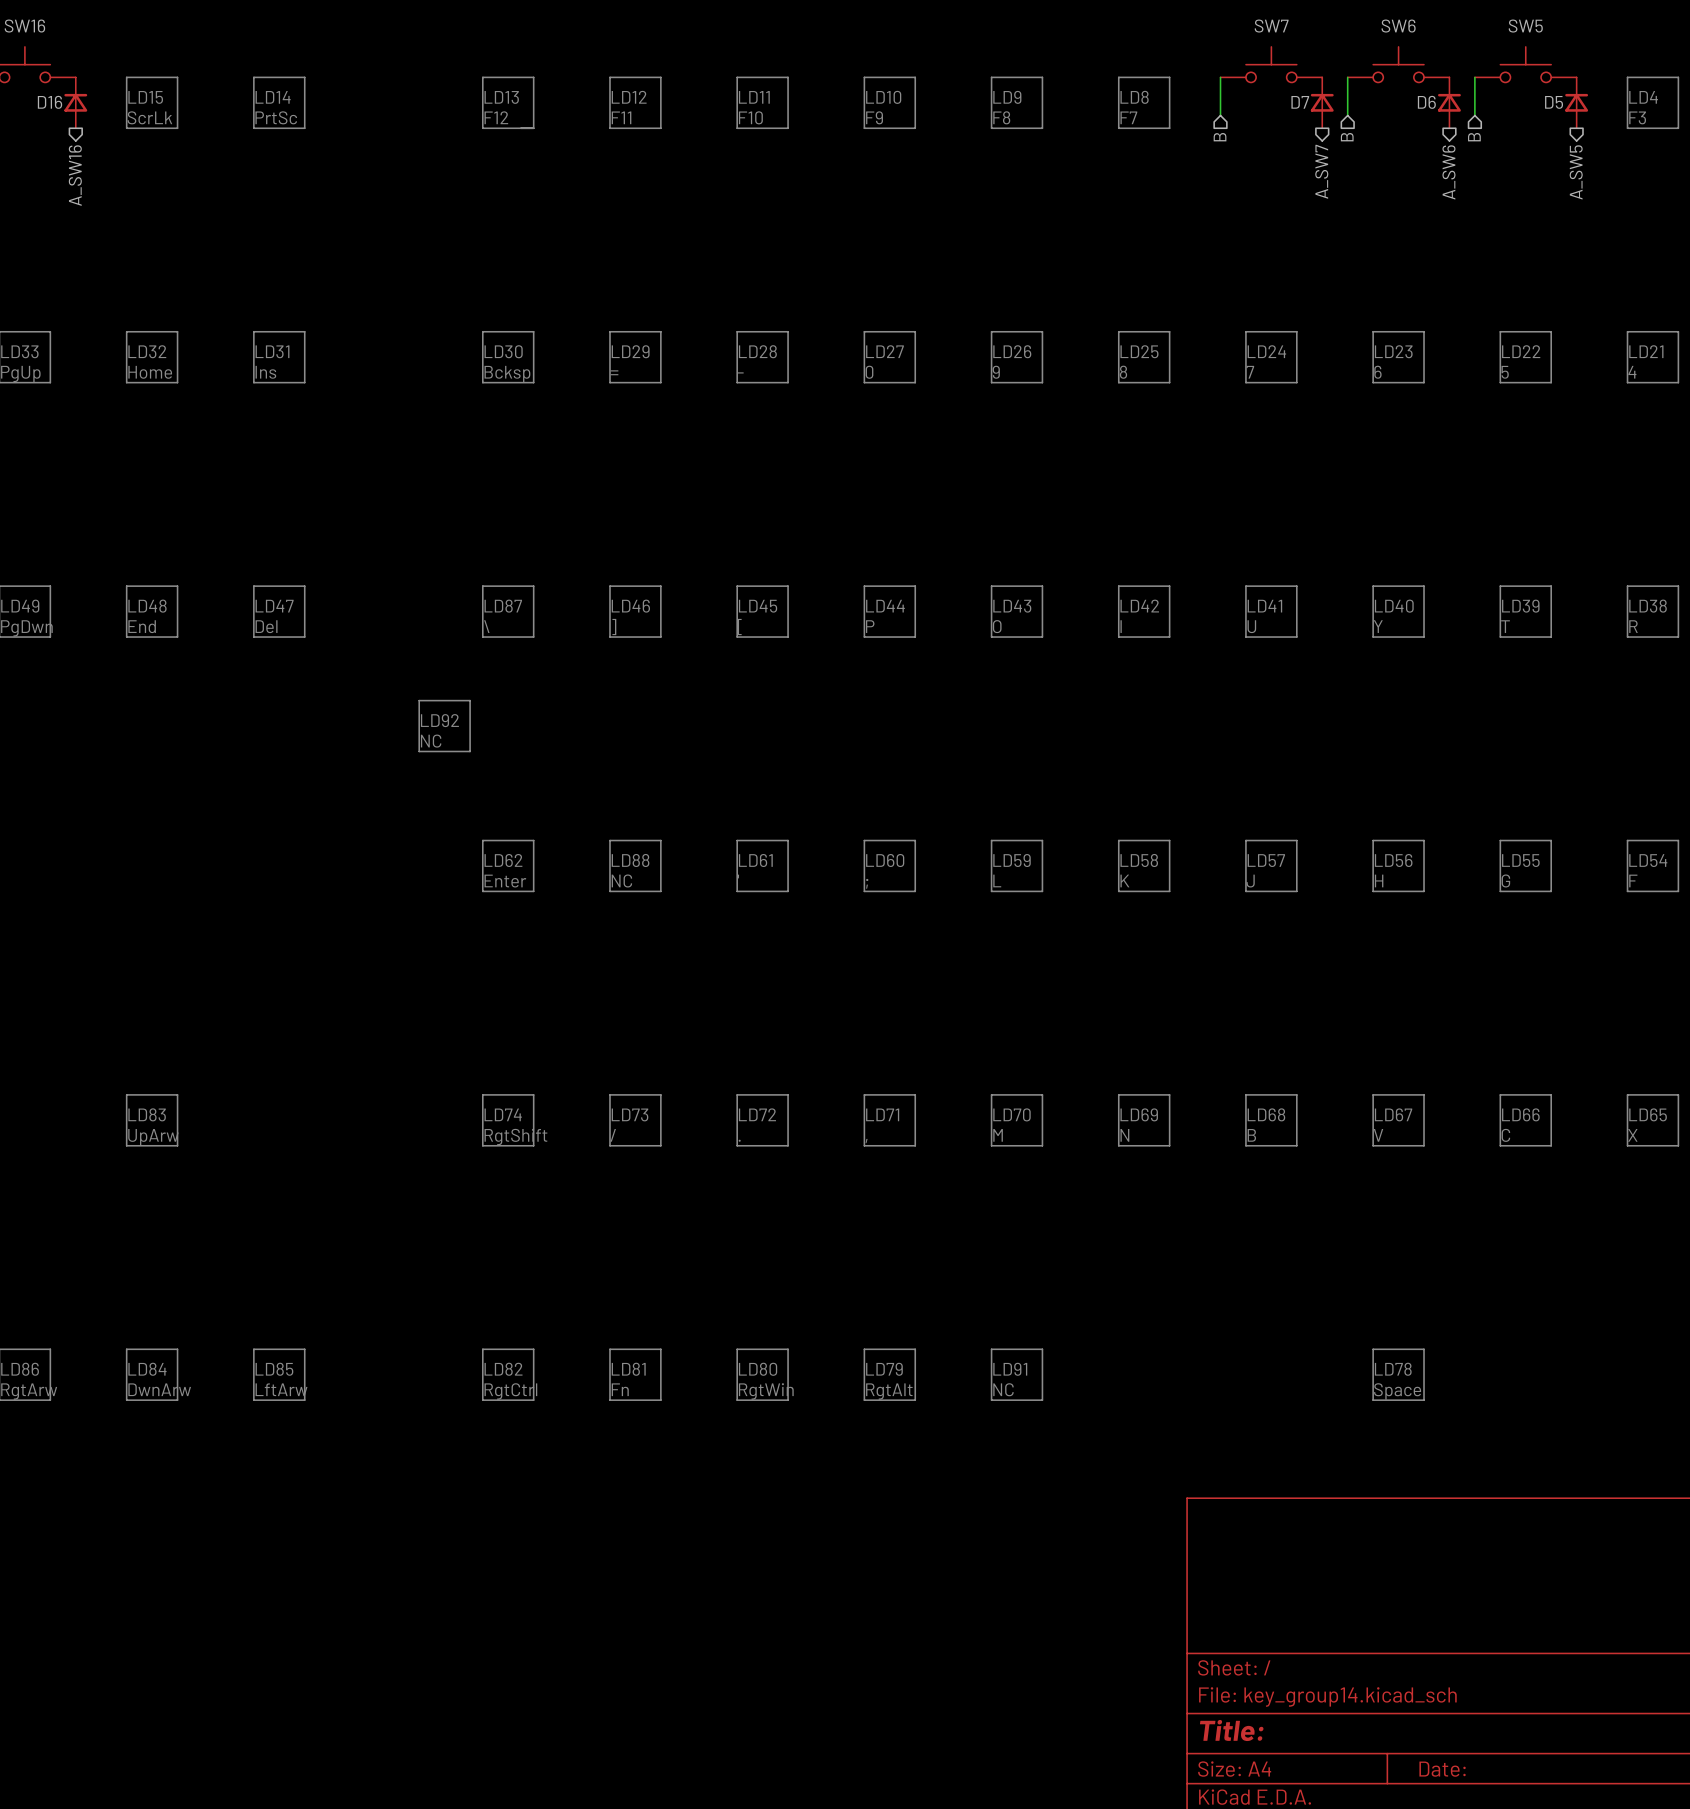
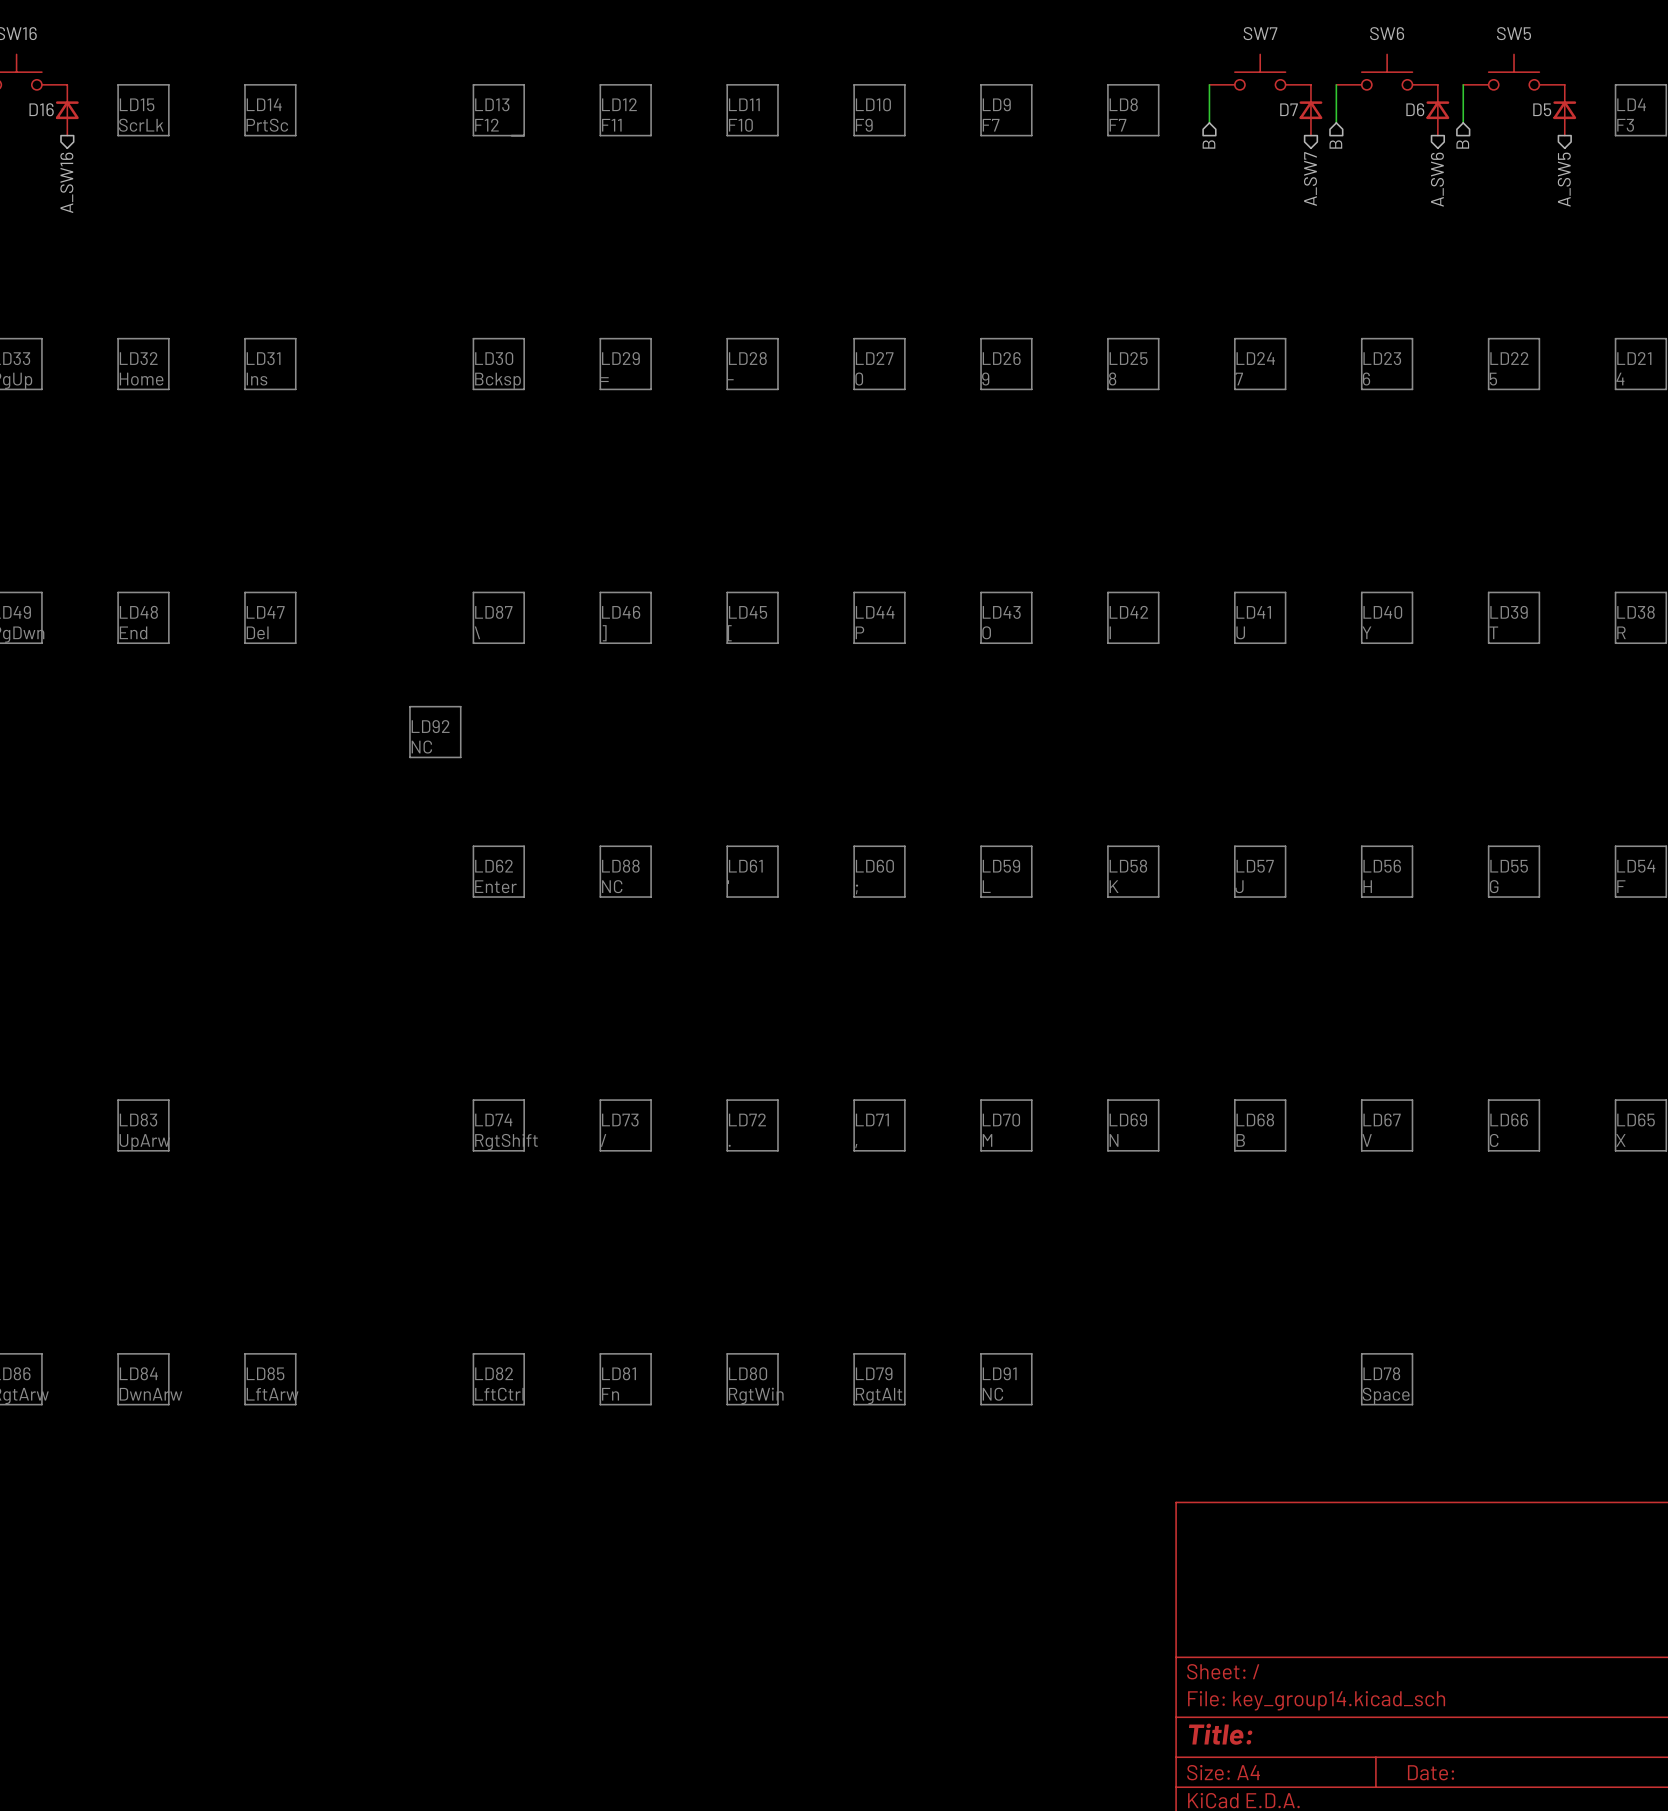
text: F8 (1001, 117) -> F7 (991, 125)
text: RgtCtrl (510, 1391) -> LftCtrl (499, 1394)

